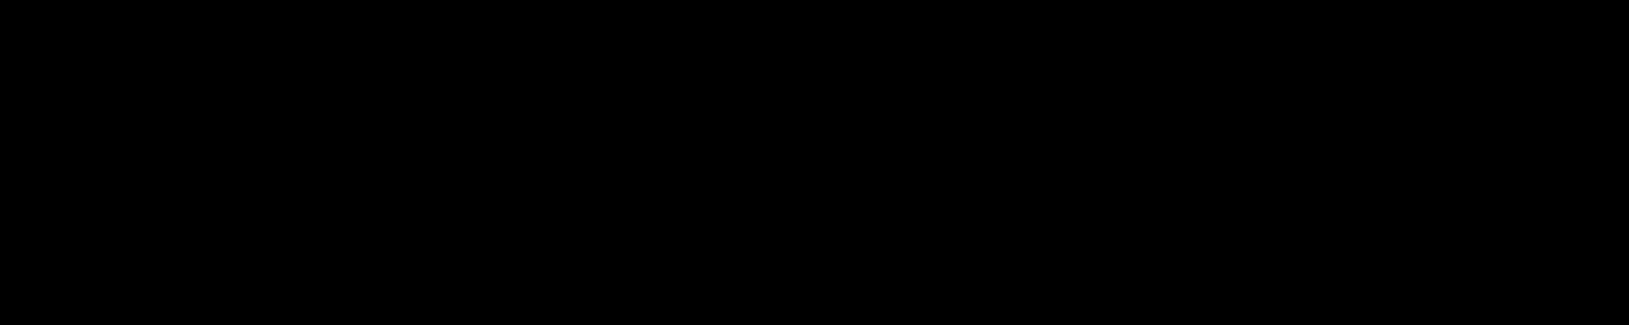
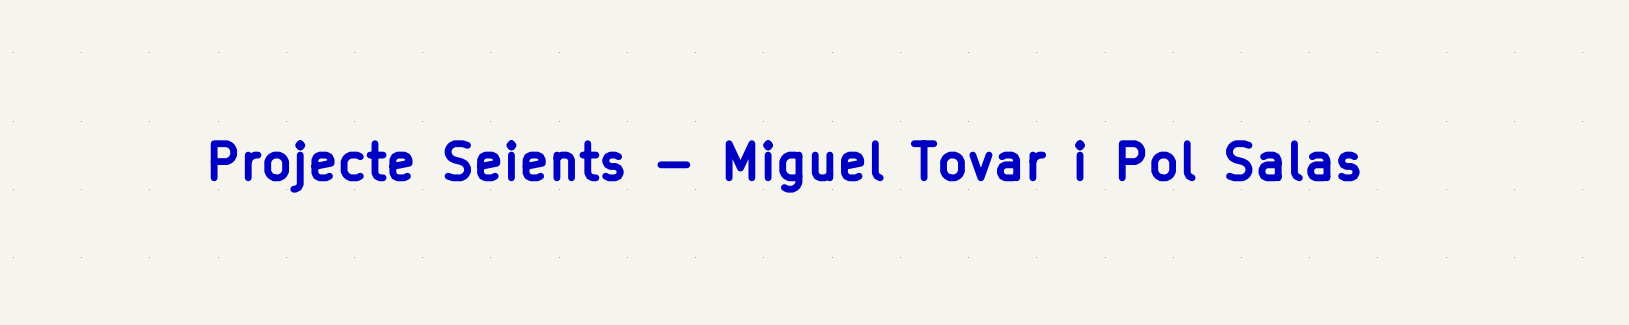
text: none -> Projecte Seients - Miguel Tovar i Pol Salas (785, 166)

